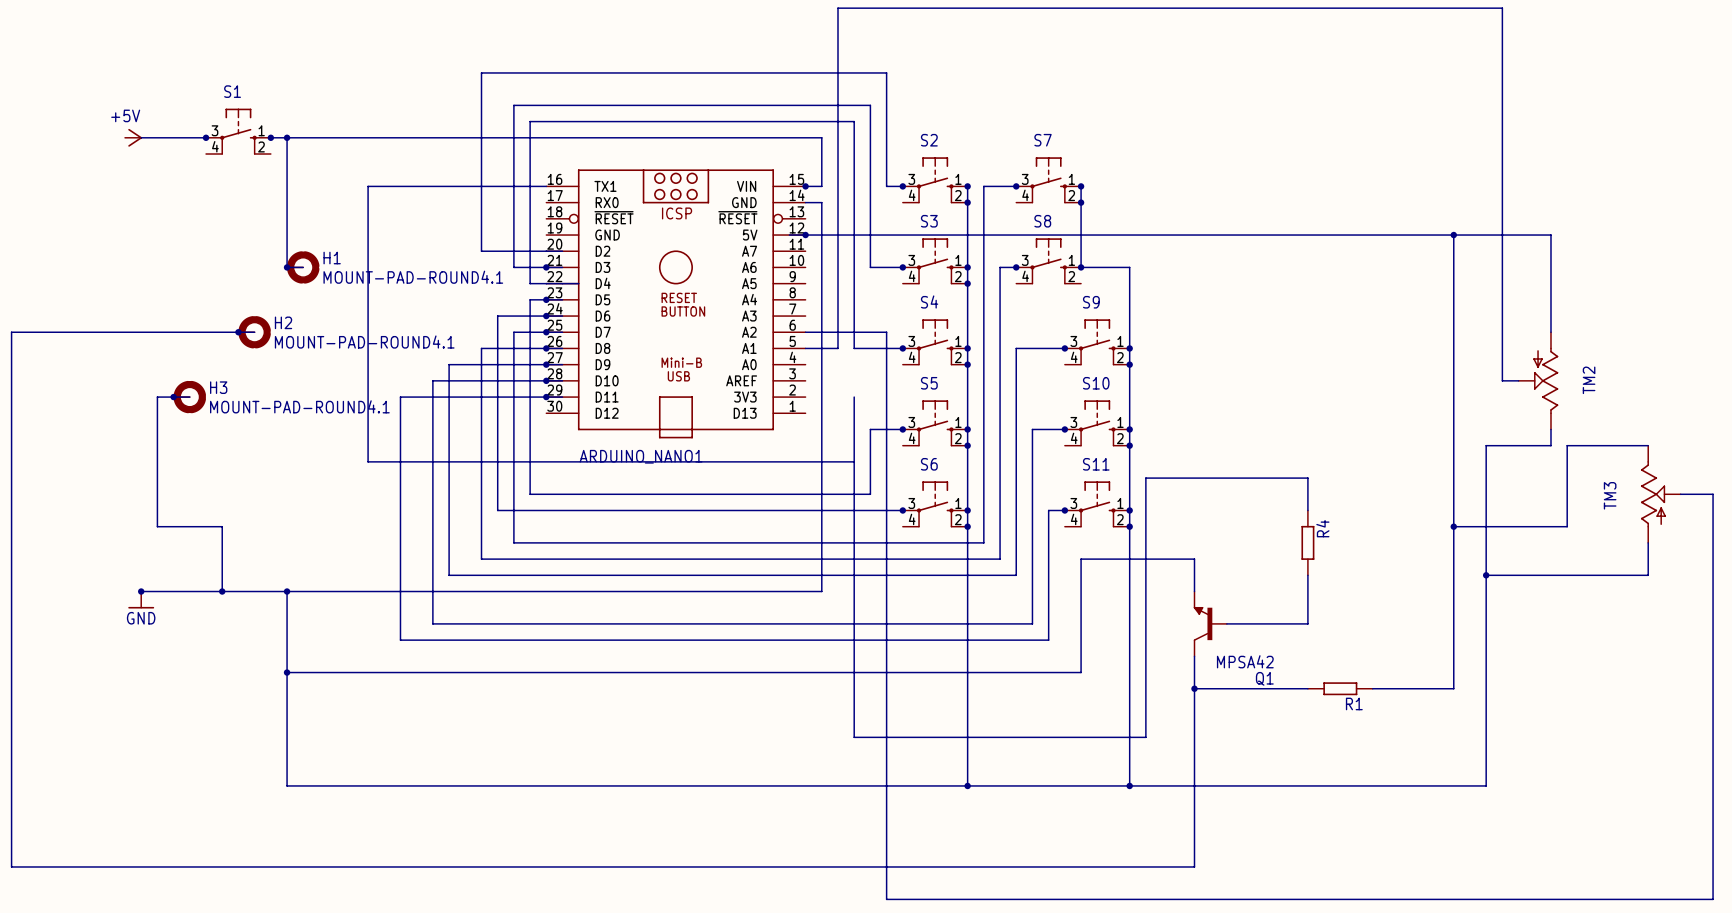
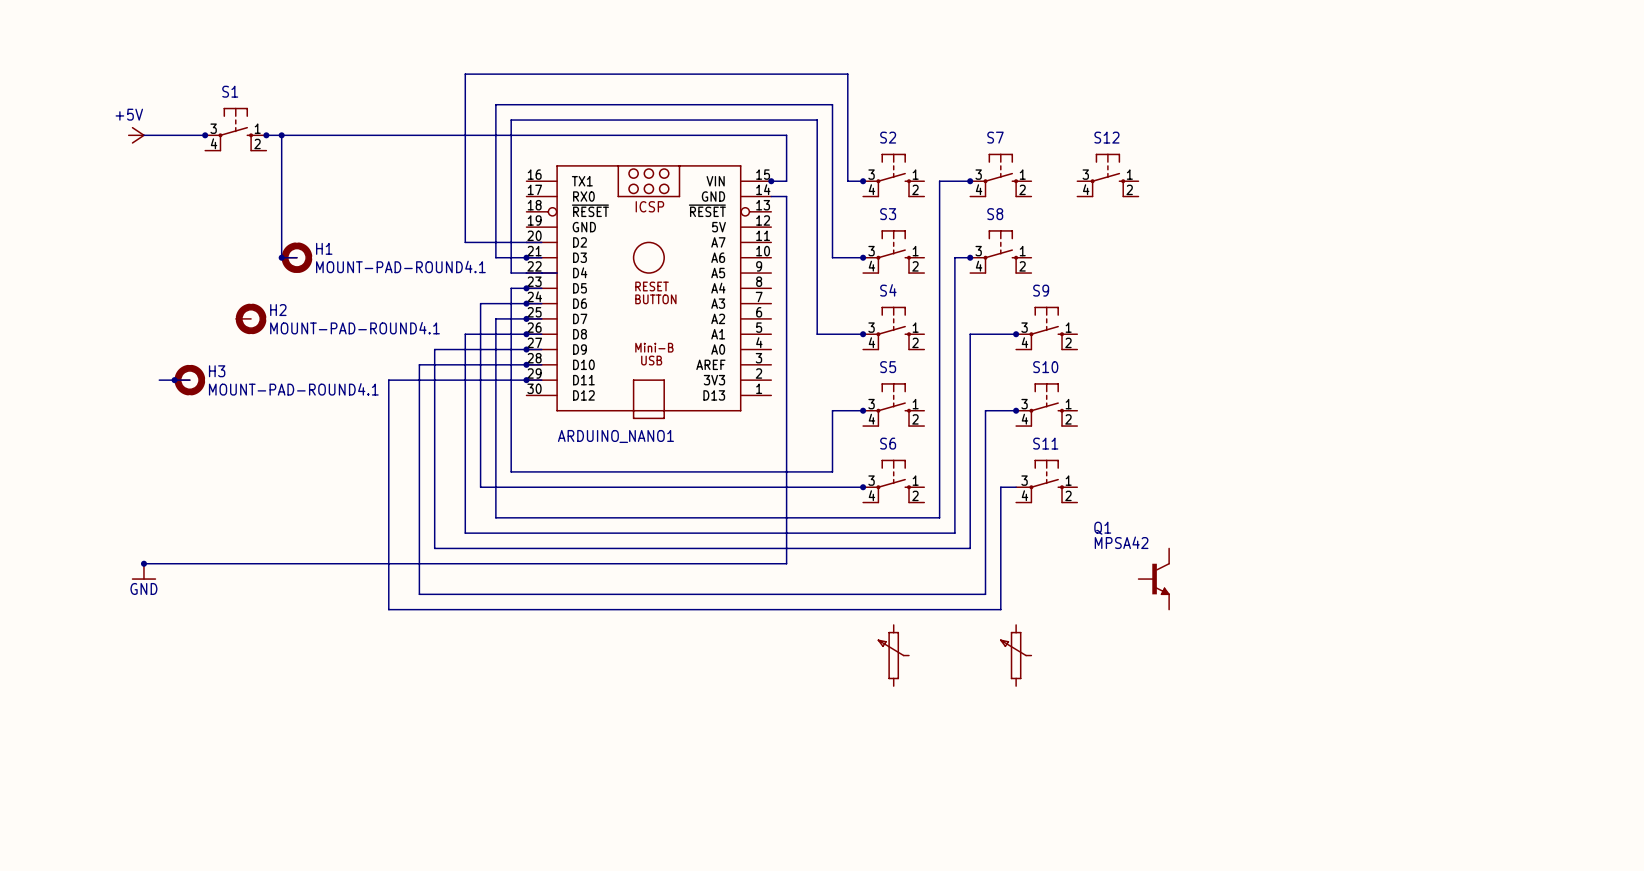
S12: none -> (1107, 175)
wire: (546, 186) (368, 186) (368, 461) (854, 461) -> none
wire: (967, 186) (967, 785) -> none
junction: (967, 186) -> none
wire: (1081, 186) (1081, 267) (1129, 267) (1129, 785) -> none
junction: (1081, 186) -> none
junction: (967, 202) -> none
junction: (1081, 202) -> none
wire: (789, 235) (1550, 235) (1550, 332) -> none
junction: (805, 235) -> none
wire: (1453, 235) (1453, 688) (1372, 688) -> none
junction: (1453, 235) -> none
junction: (967, 267) -> none
junction: (1081, 267) -> none
junction: (967, 283) -> none
junction: (238, 332) -> none
wire: (254, 332) (11, 332) (11, 866) (1194, 866) (1194, 656) -> none
wire: (805, 332) (886, 332) (886, 899) (1713, 899) (1713, 494) (1680, 494) -> none
wire: (805, 348) (838, 348) (838, 8) (1502, 8) (1502, 380) (1518, 380) -> none
junction: (967, 348) -> none
junction: (1129, 348) -> none
junction: (967, 364) -> none
junction: (1129, 364) -> none
TM2: (1538, 380) -> none
wire: (157, 397) (157, 526) (222, 526) (222, 591) -> none
wire: (854, 397) (854, 737) (1145, 737) (1145, 478) (1307, 478) (1307, 510) -> none
junction: (967, 429) -> none
junction: (1129, 429) -> none
wire: (1550, 429) (1550, 445) (1486, 445) (1486, 785) (287, 785) (287, 591) -> none
junction: (967, 445) -> none
junction: (1129, 445) -> none
wire: (1648, 445) (1567, 445) (1567, 526) (1453, 526) -> none
TM3: (1660, 494) -> none
junction: (967, 510) -> none
junction: (1064, 510) -> none
junction: (1129, 510) -> none
junction: (967, 526) -> none
junction: (1129, 526) -> none
junction: (1453, 526) -> none
R4: (1307, 542) -> none
wire: (1648, 542) (1648, 575) (1486, 575) -> none
wire: (1307, 575) (1307, 623) (1226, 623) -> none
junction: (1486, 575) -> none
junction: (222, 591) -> none
junction: (287, 591) -> none
wire: (1194, 591) (1194, 559) (1081, 559) (1081, 672) (287, 672) -> none
Q1 rotation: 0° (1203, 623) -> 180° (1160, 579)
junction: (287, 672) -> none
part: none -> (893, 655)
part: none -> (1016, 655)
wire: (1194, 688) (1307, 688) -> none
junction: (1194, 688) -> none
R1: (1340, 688) -> none
junction: (967, 785) -> none
junction: (1129, 785) -> none

